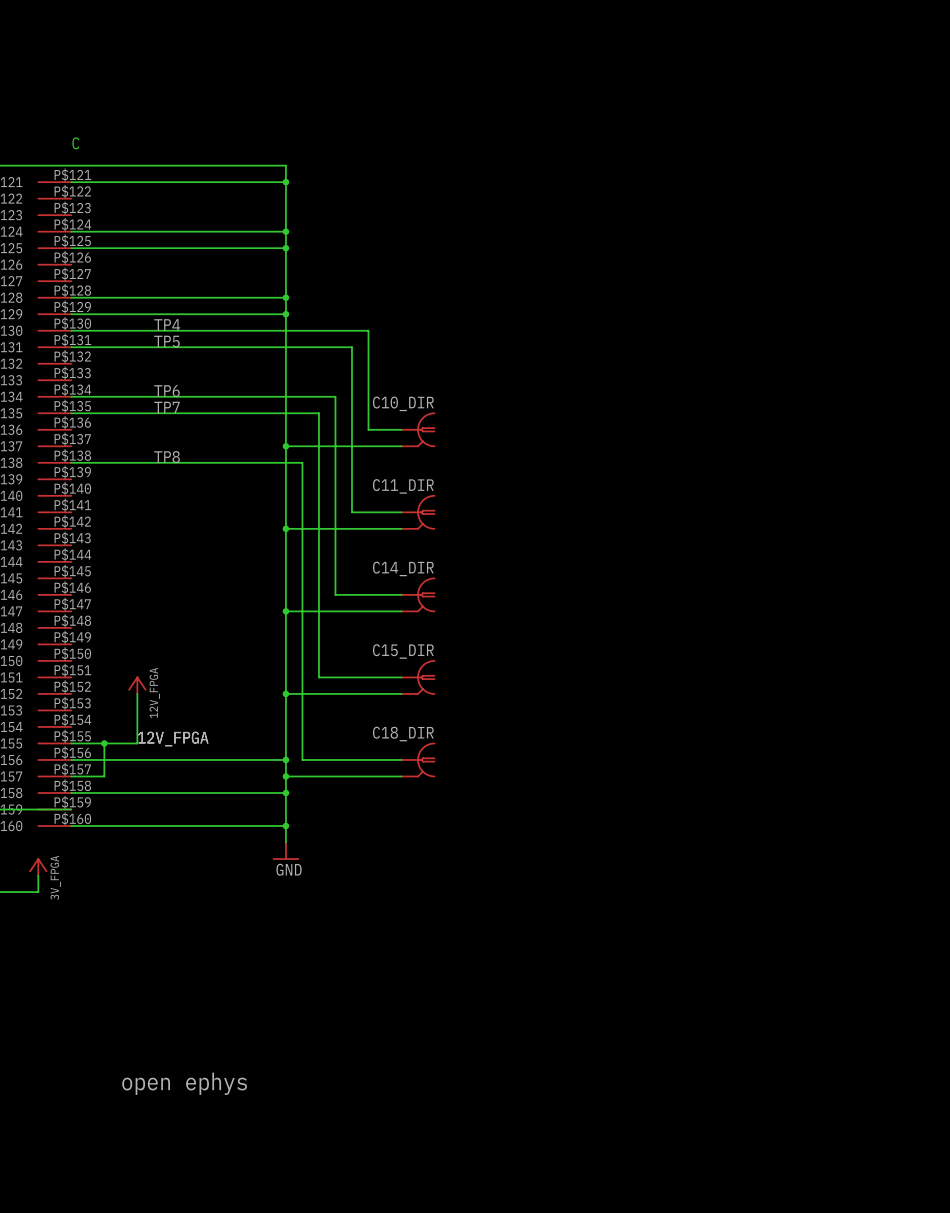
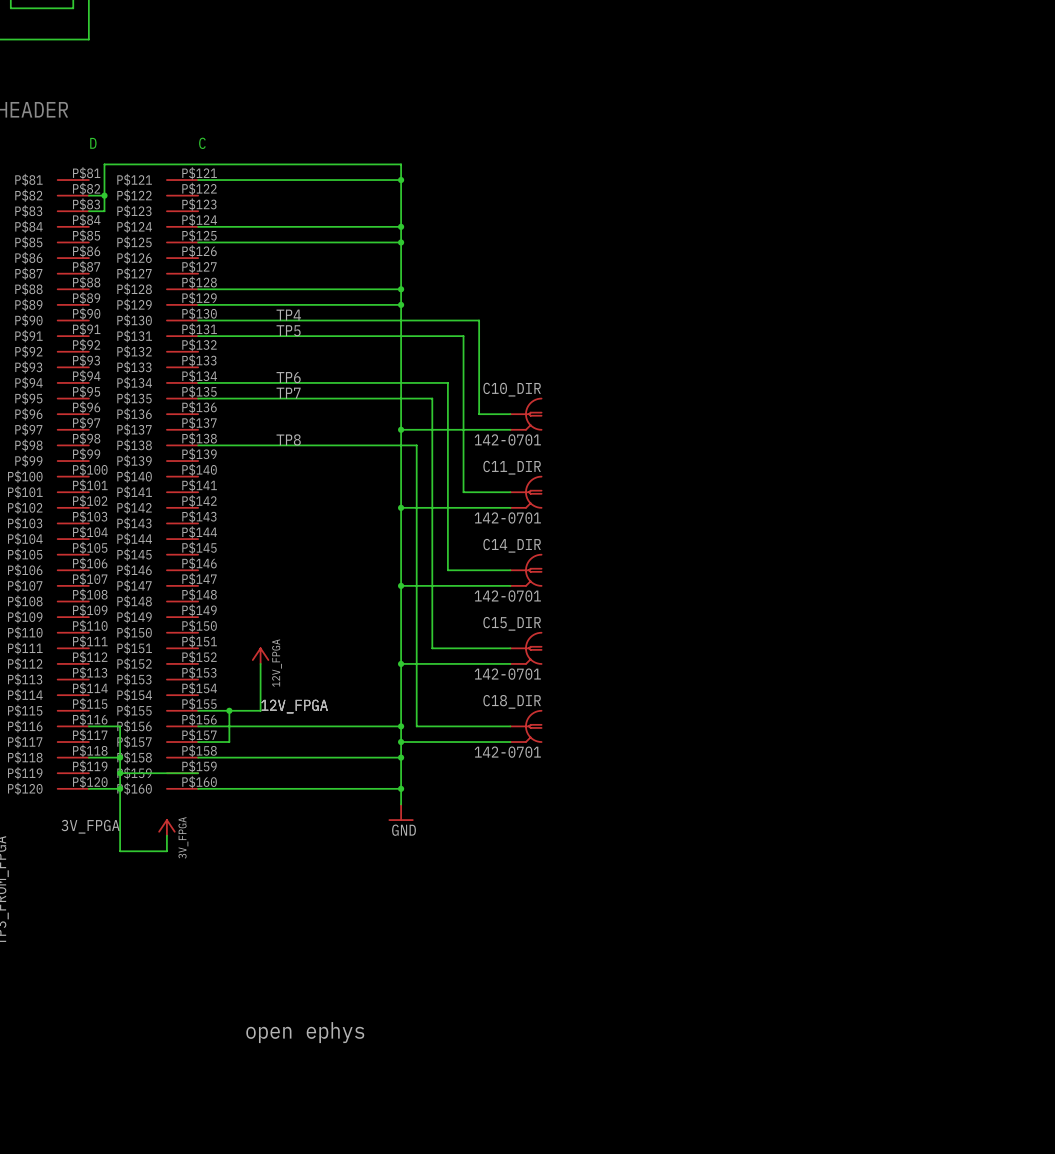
C10_DIR value: none -> 142-0701 (507, 439)
C11_DIR value: none -> 142-0701 (507, 517)
C14_DIR value: none -> 142-0701 (507, 596)
C15_DIR value: none -> 142-0701 (507, 674)
C18_DIR value: none -> 142-0701 (507, 752)

